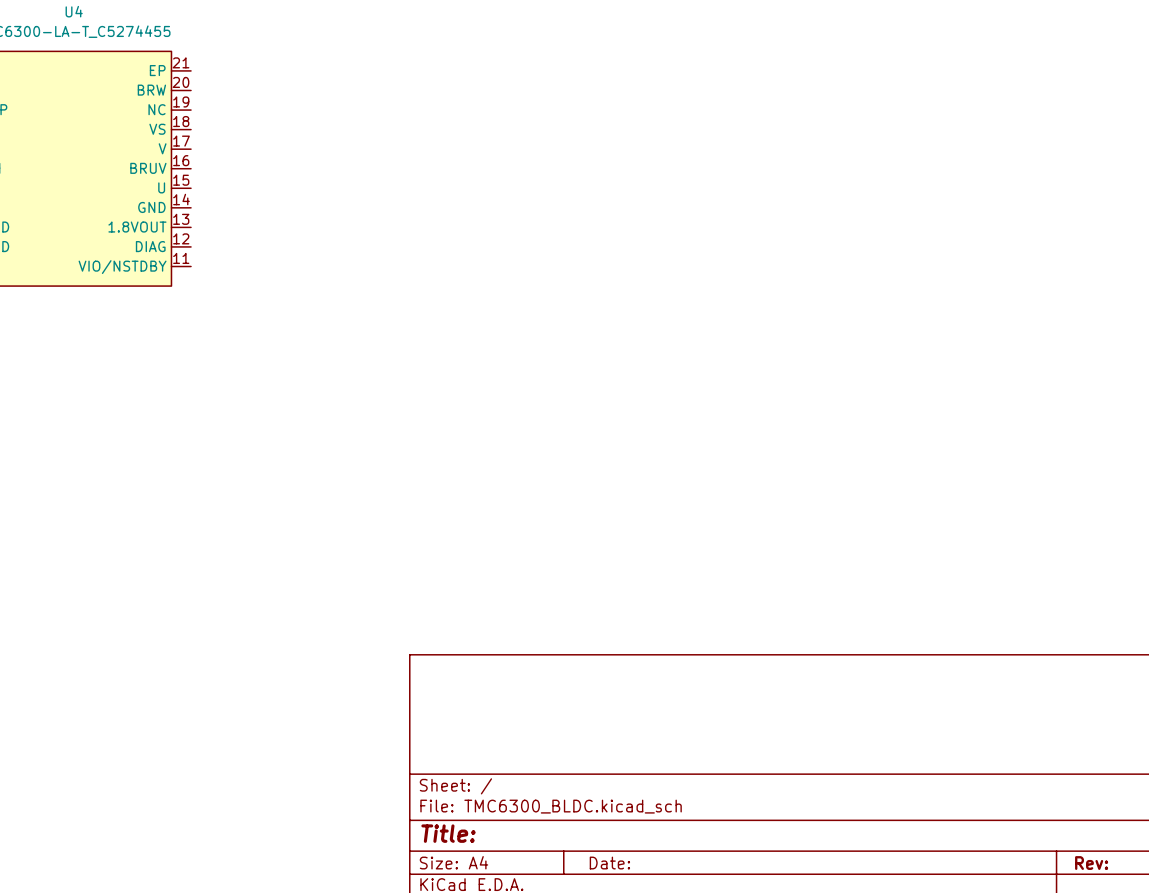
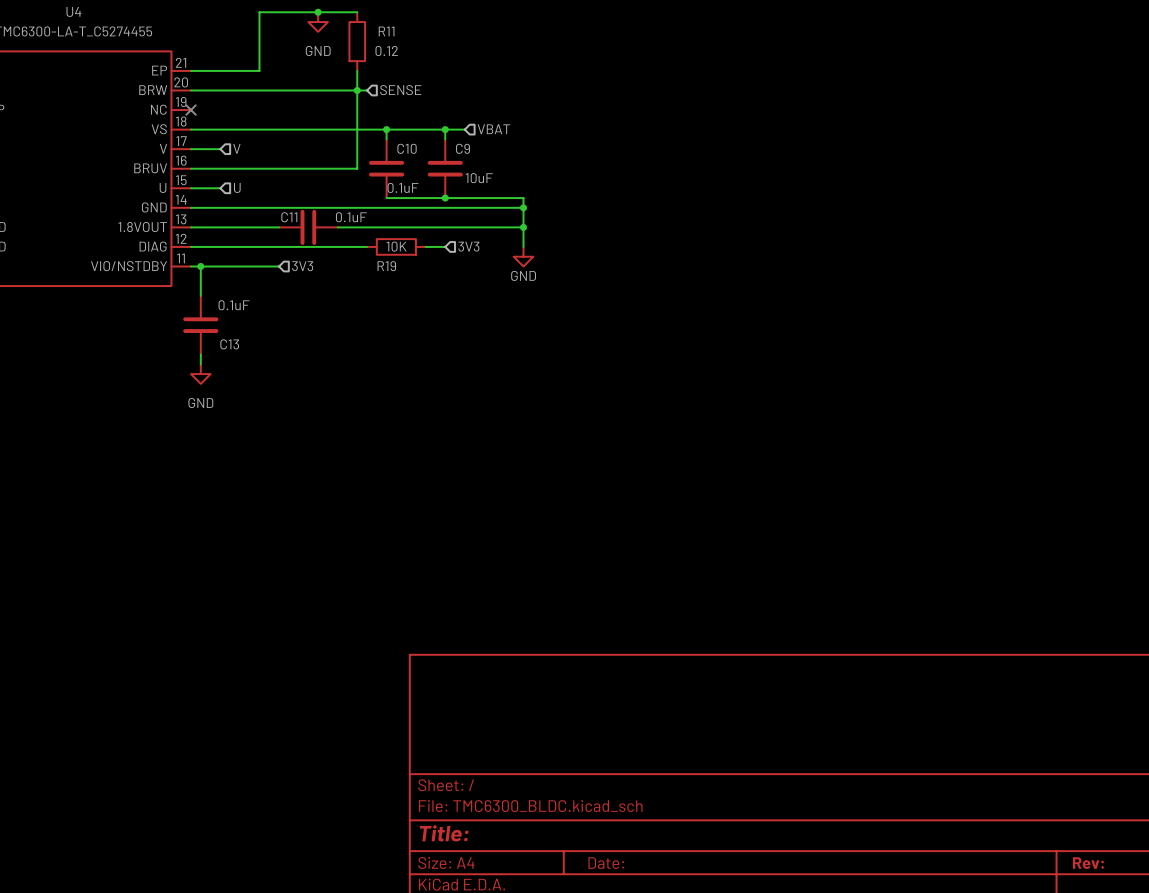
junction: none -> (318, 12)
wire: none -> (357, 12) (259, 12) (259, 70) (191, 70)
power symbol: none -> GND (318, 22)
R11: none -> 0.12 (357, 41)
wire: none -> (357, 70) (357, 168) (191, 168)
wire: none -> (191, 90) (367, 90)
junction: none -> (357, 90)
hierarchical label: none -> SENSE (400, 90)
no-connect mark: none -> (191, 110)
wire: none -> (191, 129) (464, 129)
wire: none -> (386, 129) (386, 139)
junction: none -> (386, 129)
wire: none -> (445, 129) (445, 139)
junction: none -> (445, 129)
hierarchical label: none -> VBAT (493, 129)
hierarchical label: none -> V (236, 148)
wire: none -> (191, 149) (220, 149)
C10: none -> 0.1uF (386, 168)
C9: none -> 10uF (445, 168)
hierarchical label: none -> U (237, 187)
wire: none -> (191, 188) (220, 188)
wire: none -> (386, 198) (523, 198) (523, 246)
junction: none -> (445, 198)
wire: none -> (191, 207) (523, 207)
junction: none -> (523, 207)
wire: none -> (191, 227) (279, 227)
C11: none -> 0.1uF (308, 227)
wire: none -> (337, 227) (523, 227)
junction: none -> (523, 227)
wire: none -> (191, 246) (367, 246)
R19: none -> 10K (396, 246)
wire: none -> (425, 246) (445, 246)
hierarchical label: none -> 3V3 (468, 246)
power symbol: none -> GND (523, 256)
wire: none -> (191, 266) (279, 266)
wire: none -> (200, 266) (200, 295)
junction: none -> (200, 266)
hierarchical label: none -> 3V3 (302, 266)
C13: none -> 0.1uF (200, 325)
wire: none -> (200, 354) (200, 364)
power symbol: none -> GND (200, 374)

